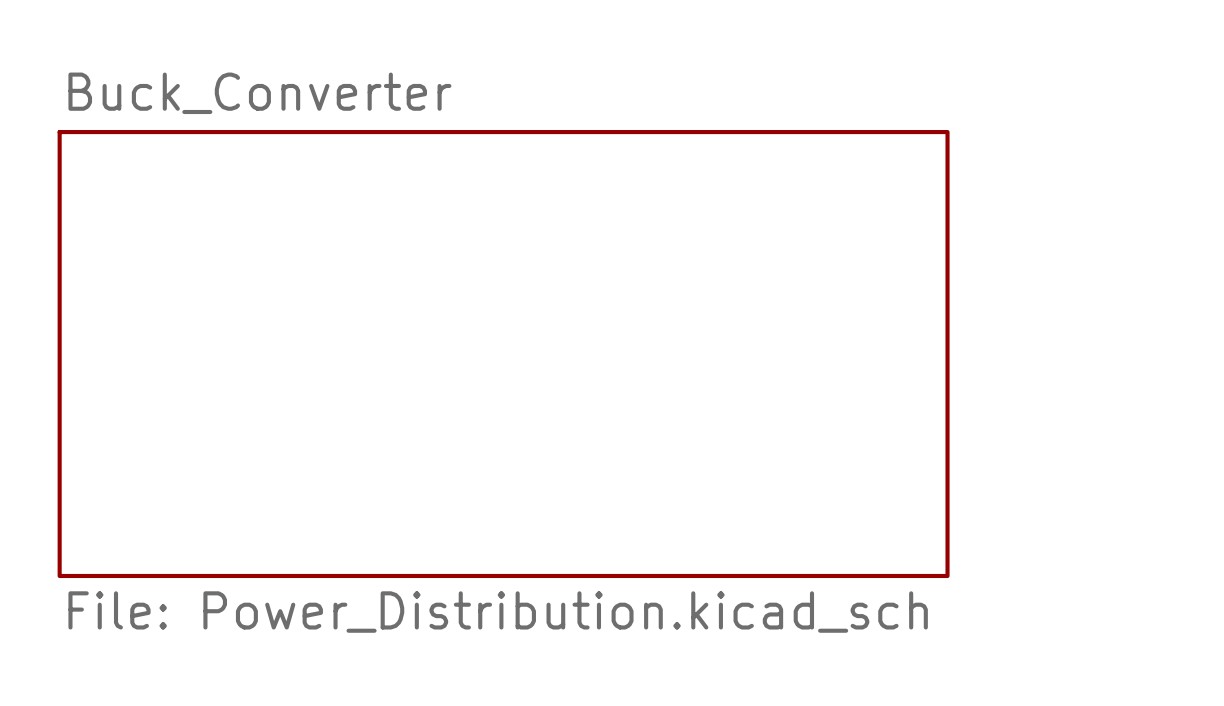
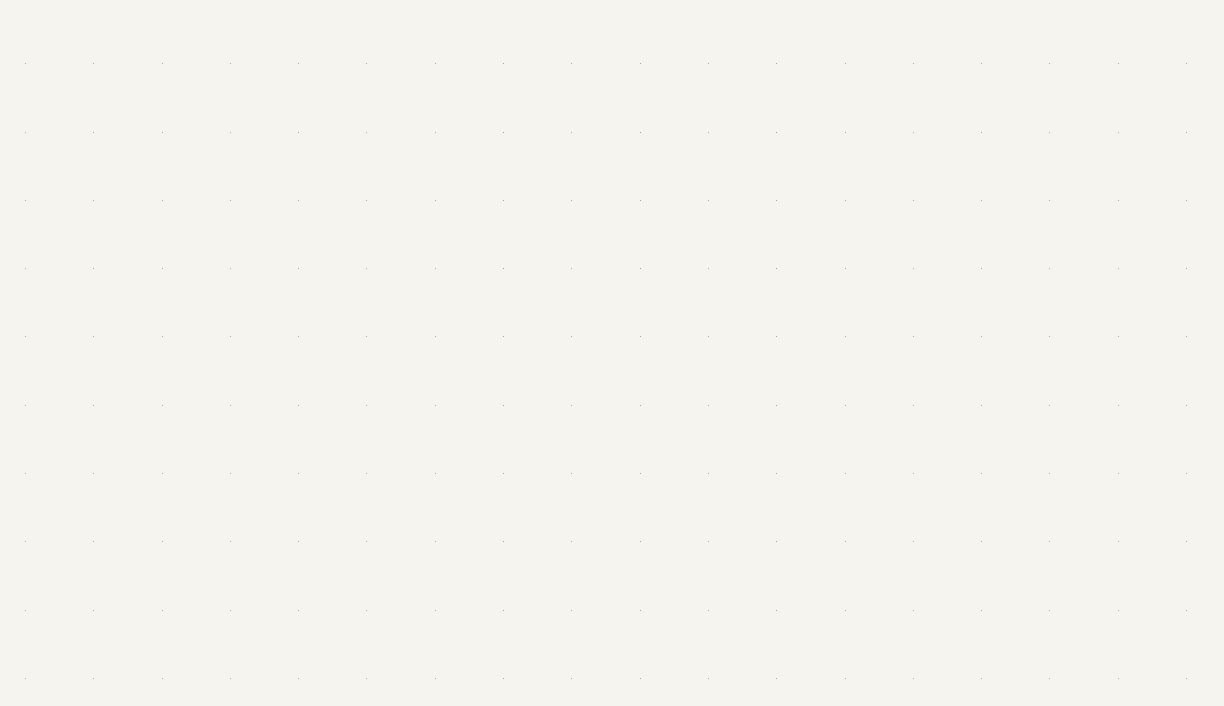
sheet Buck_Converter: File: Power_Distribution.kicad_sch (503, 354) -> none

